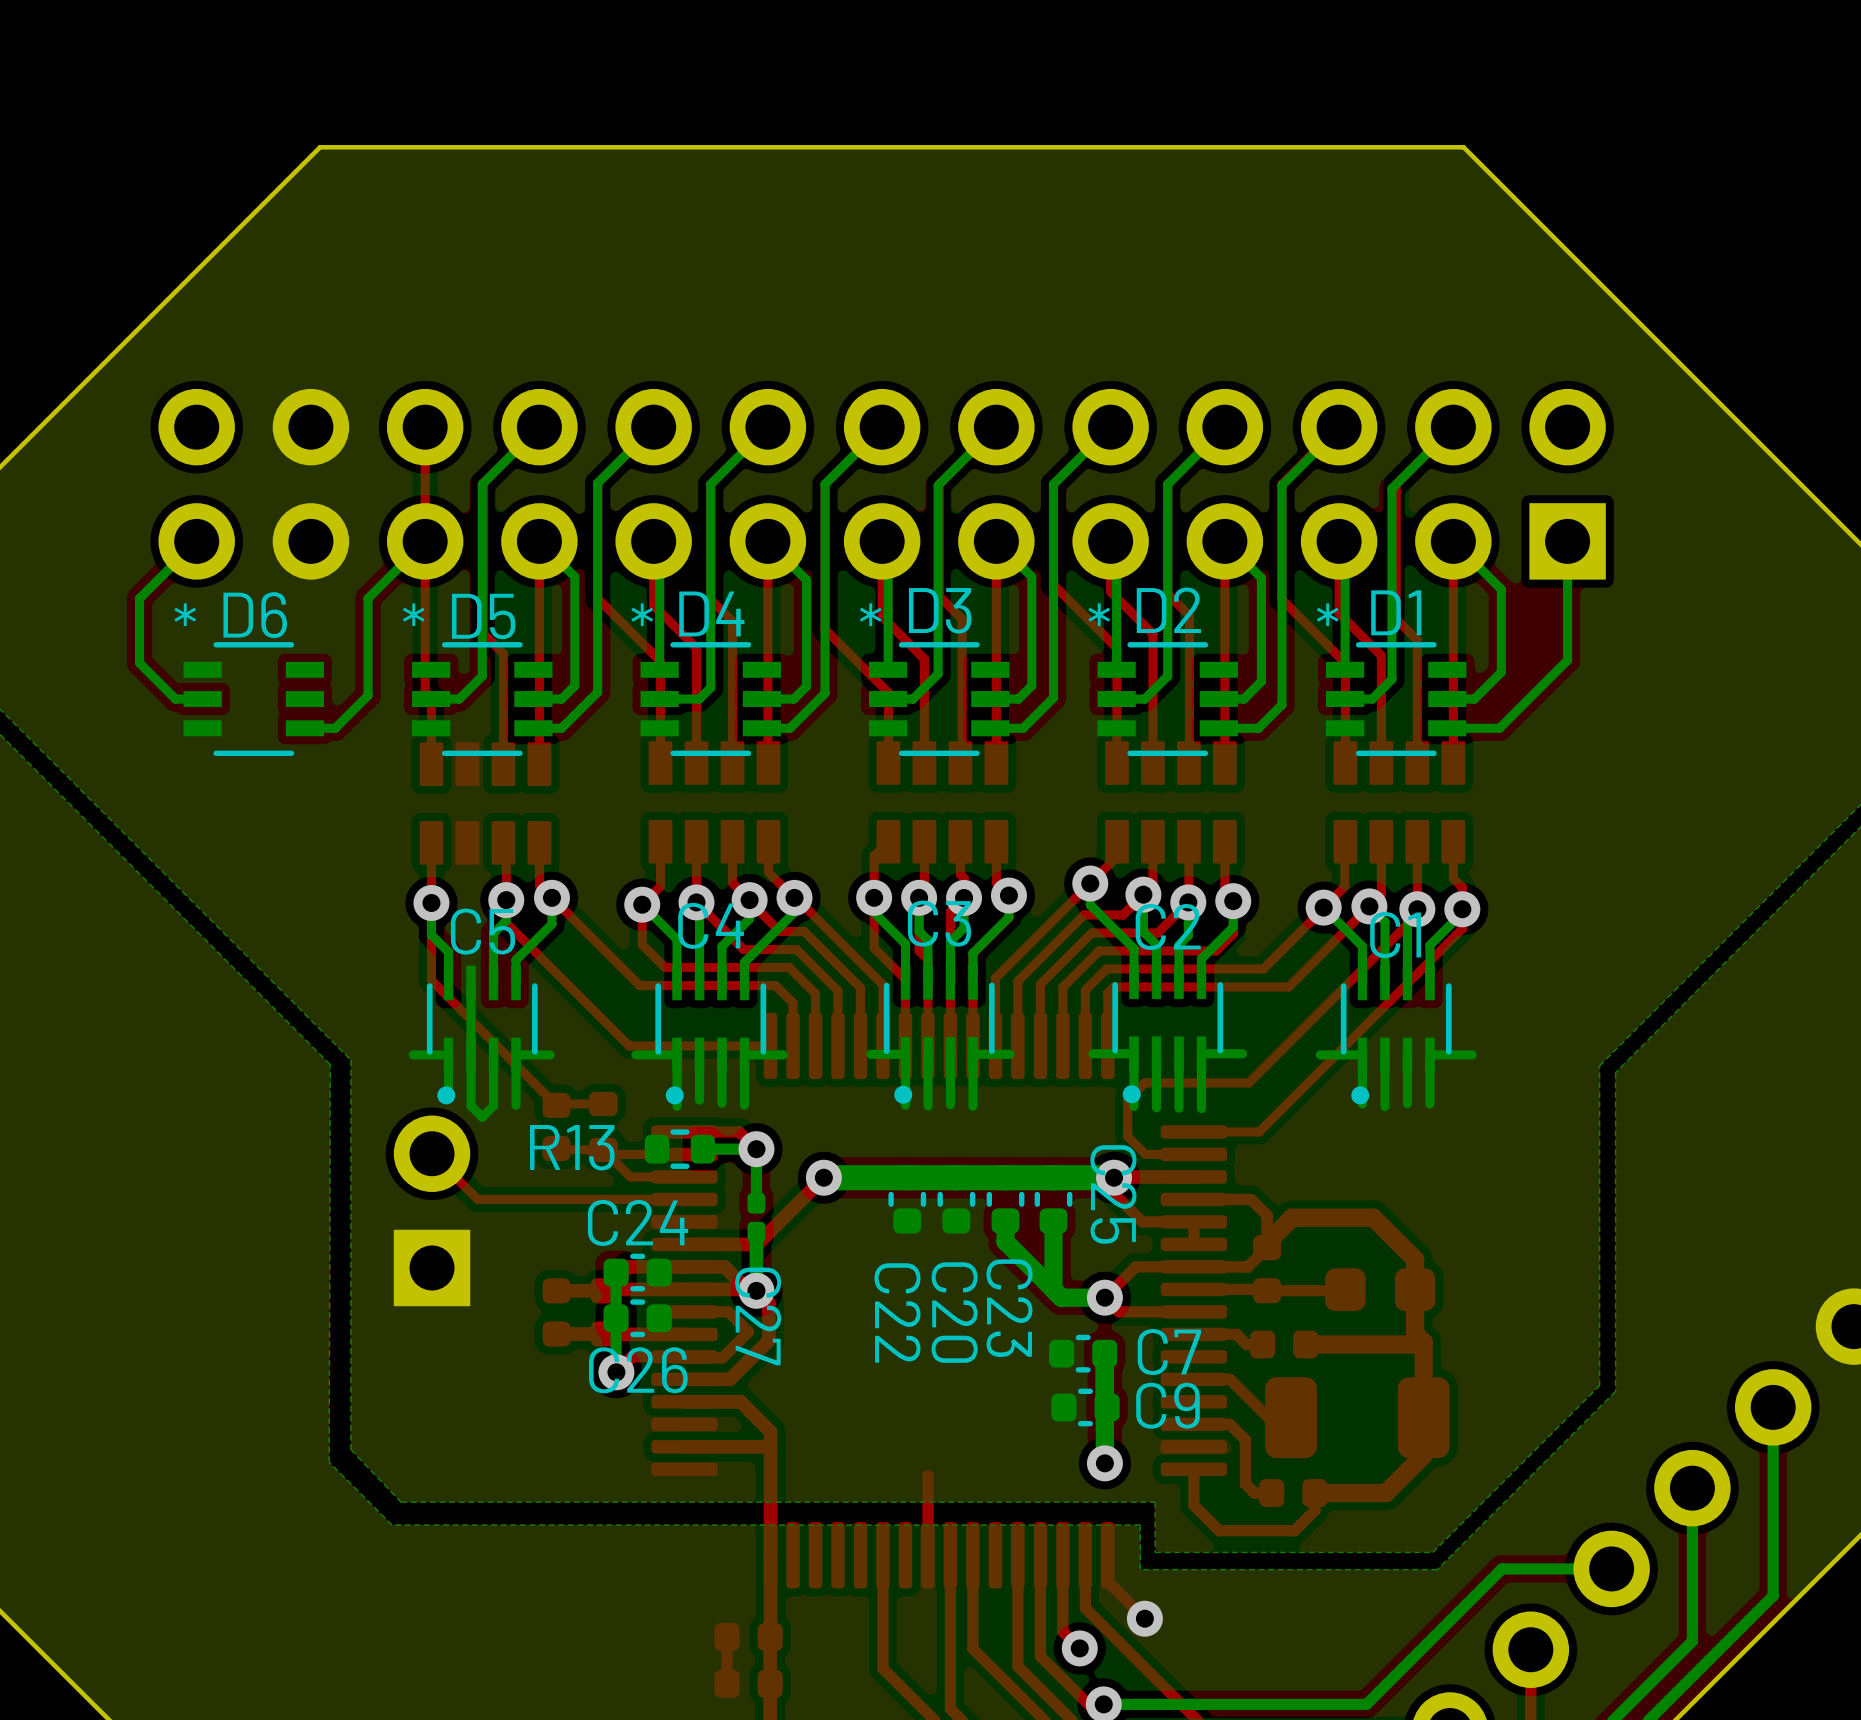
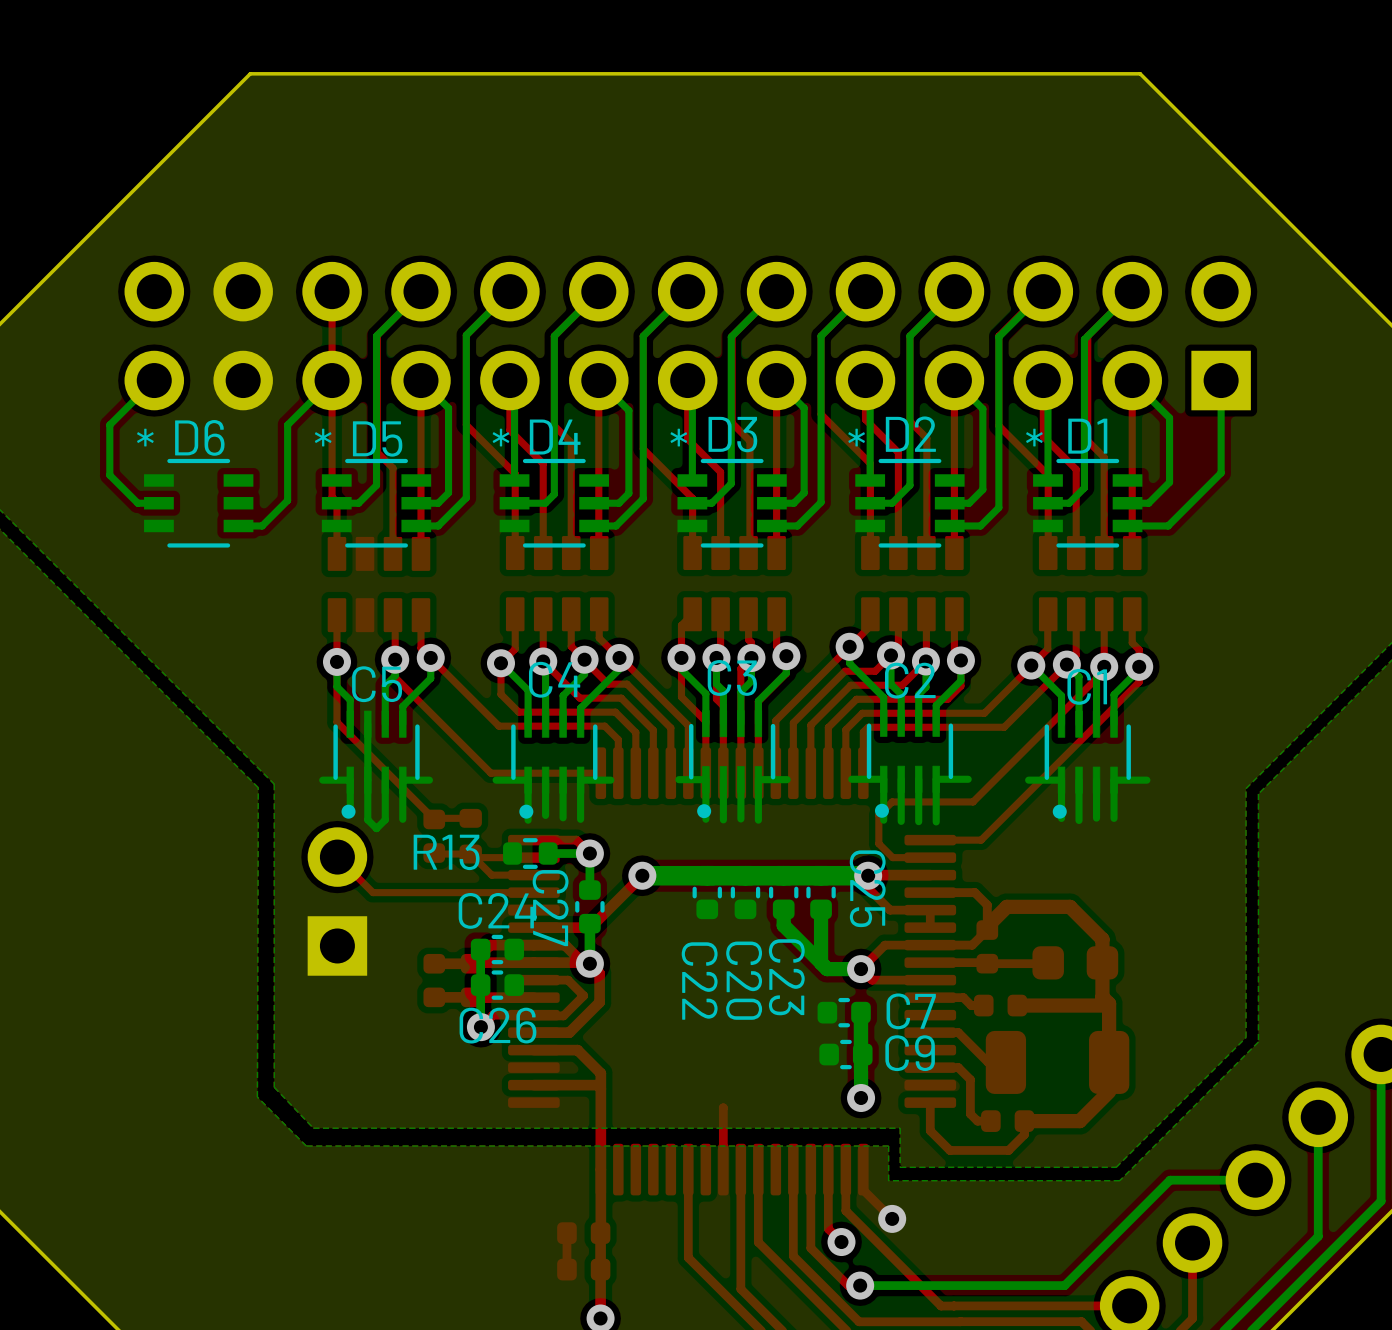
C27 footprint: [747, 1192, 766, 1243] -> [575, 880, 605, 934]
C27 name position: C27 (758, 1316) -> C27 (550, 908)

